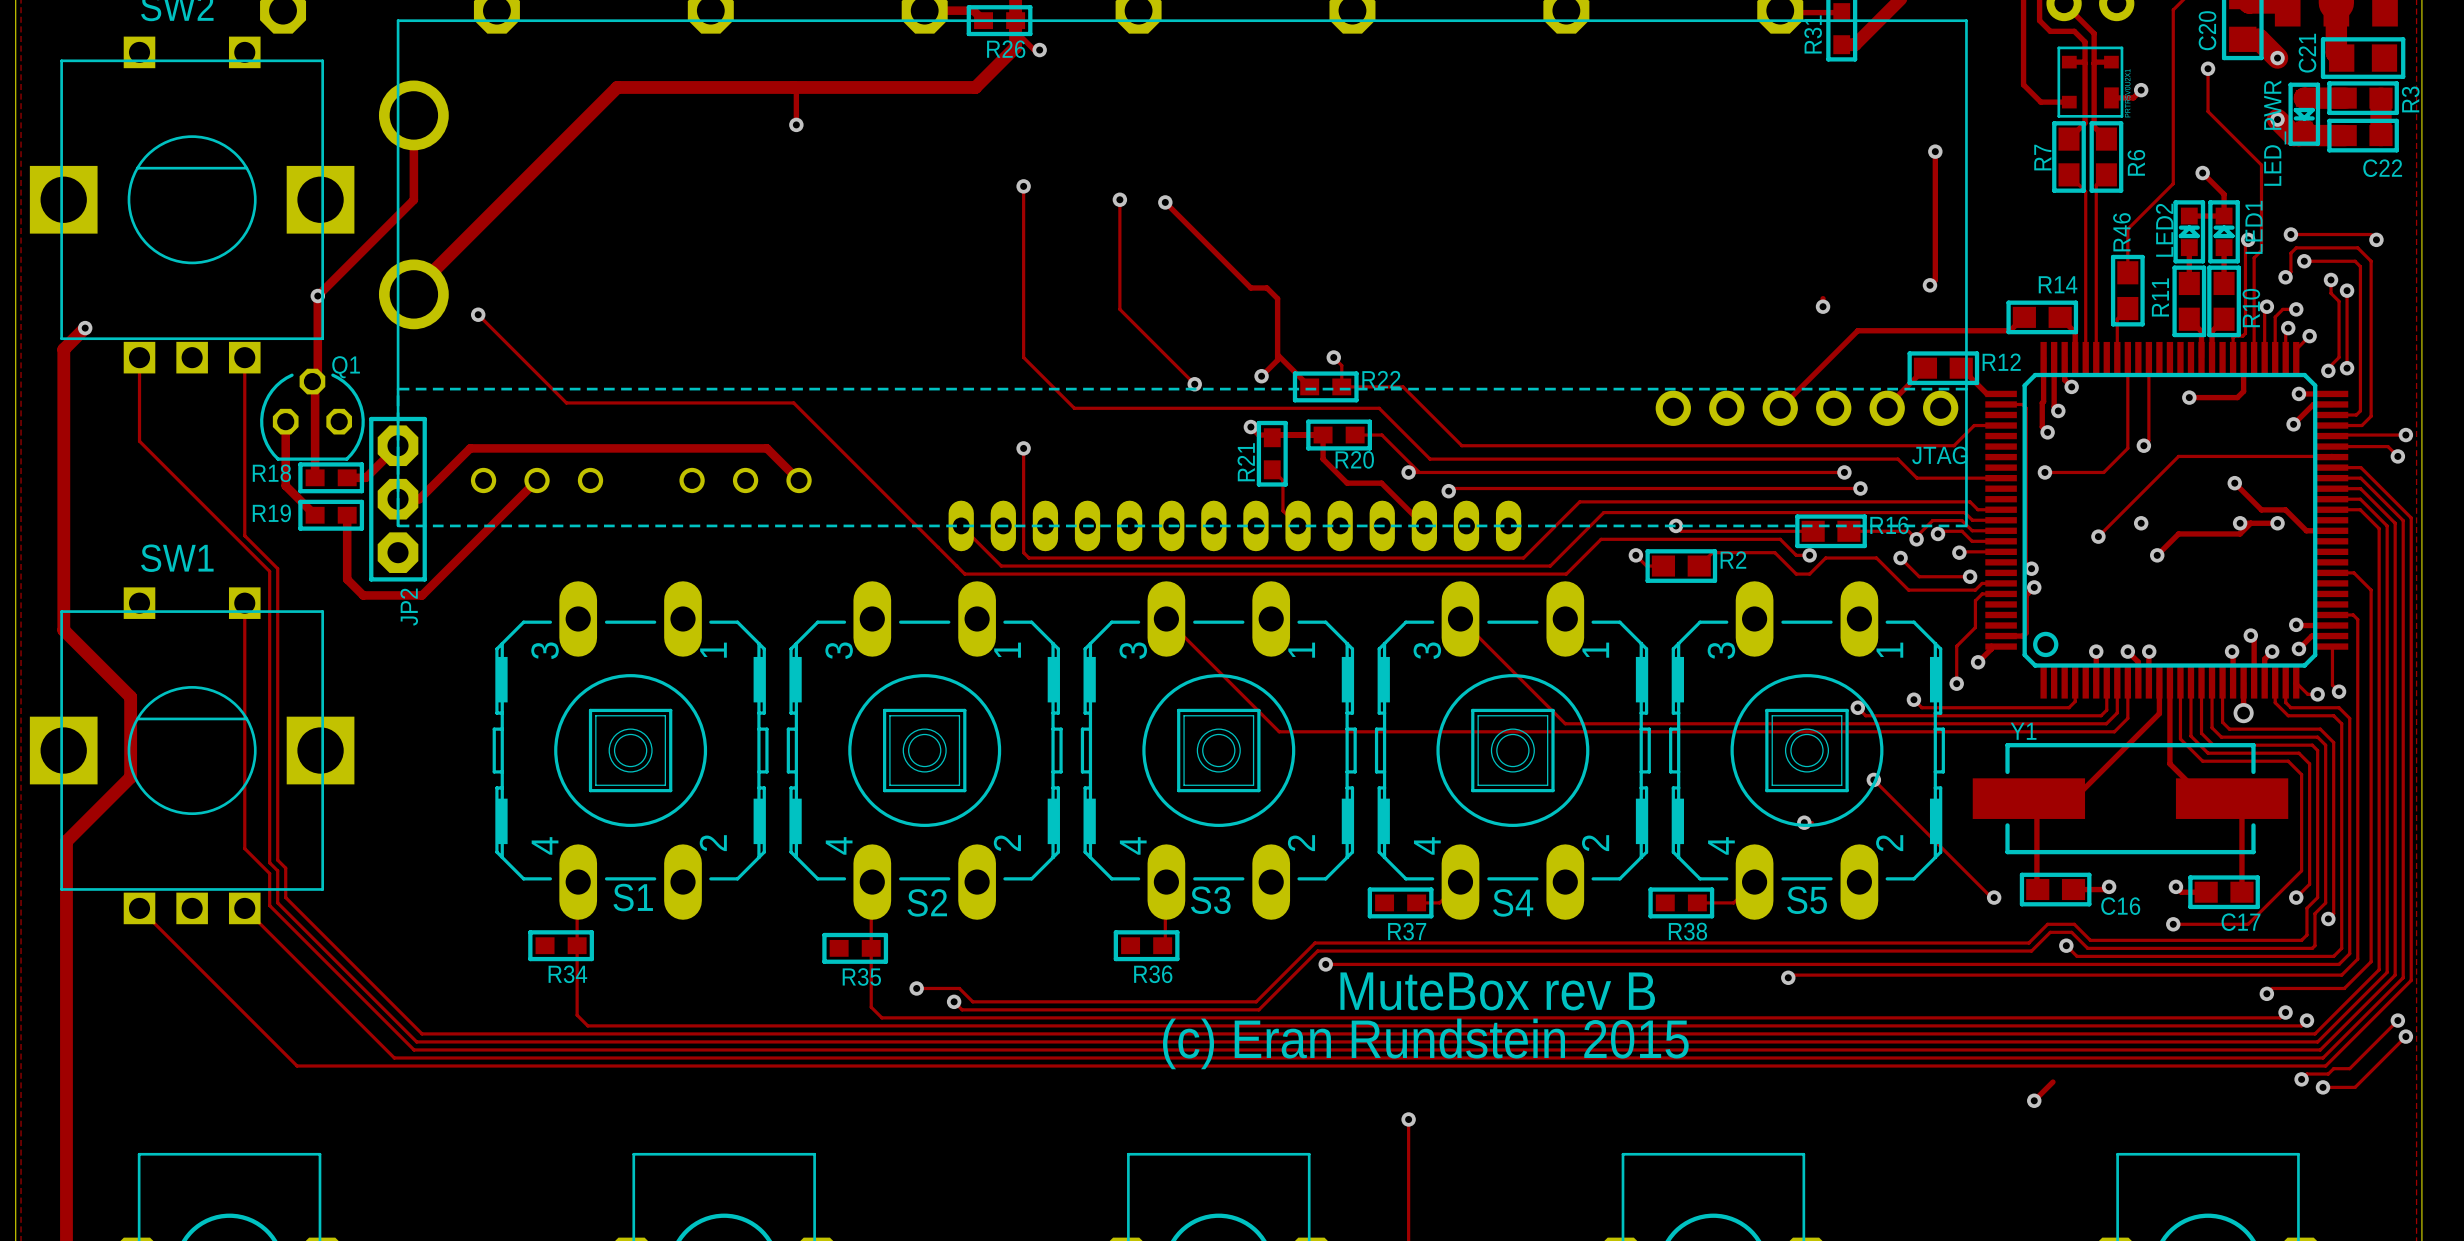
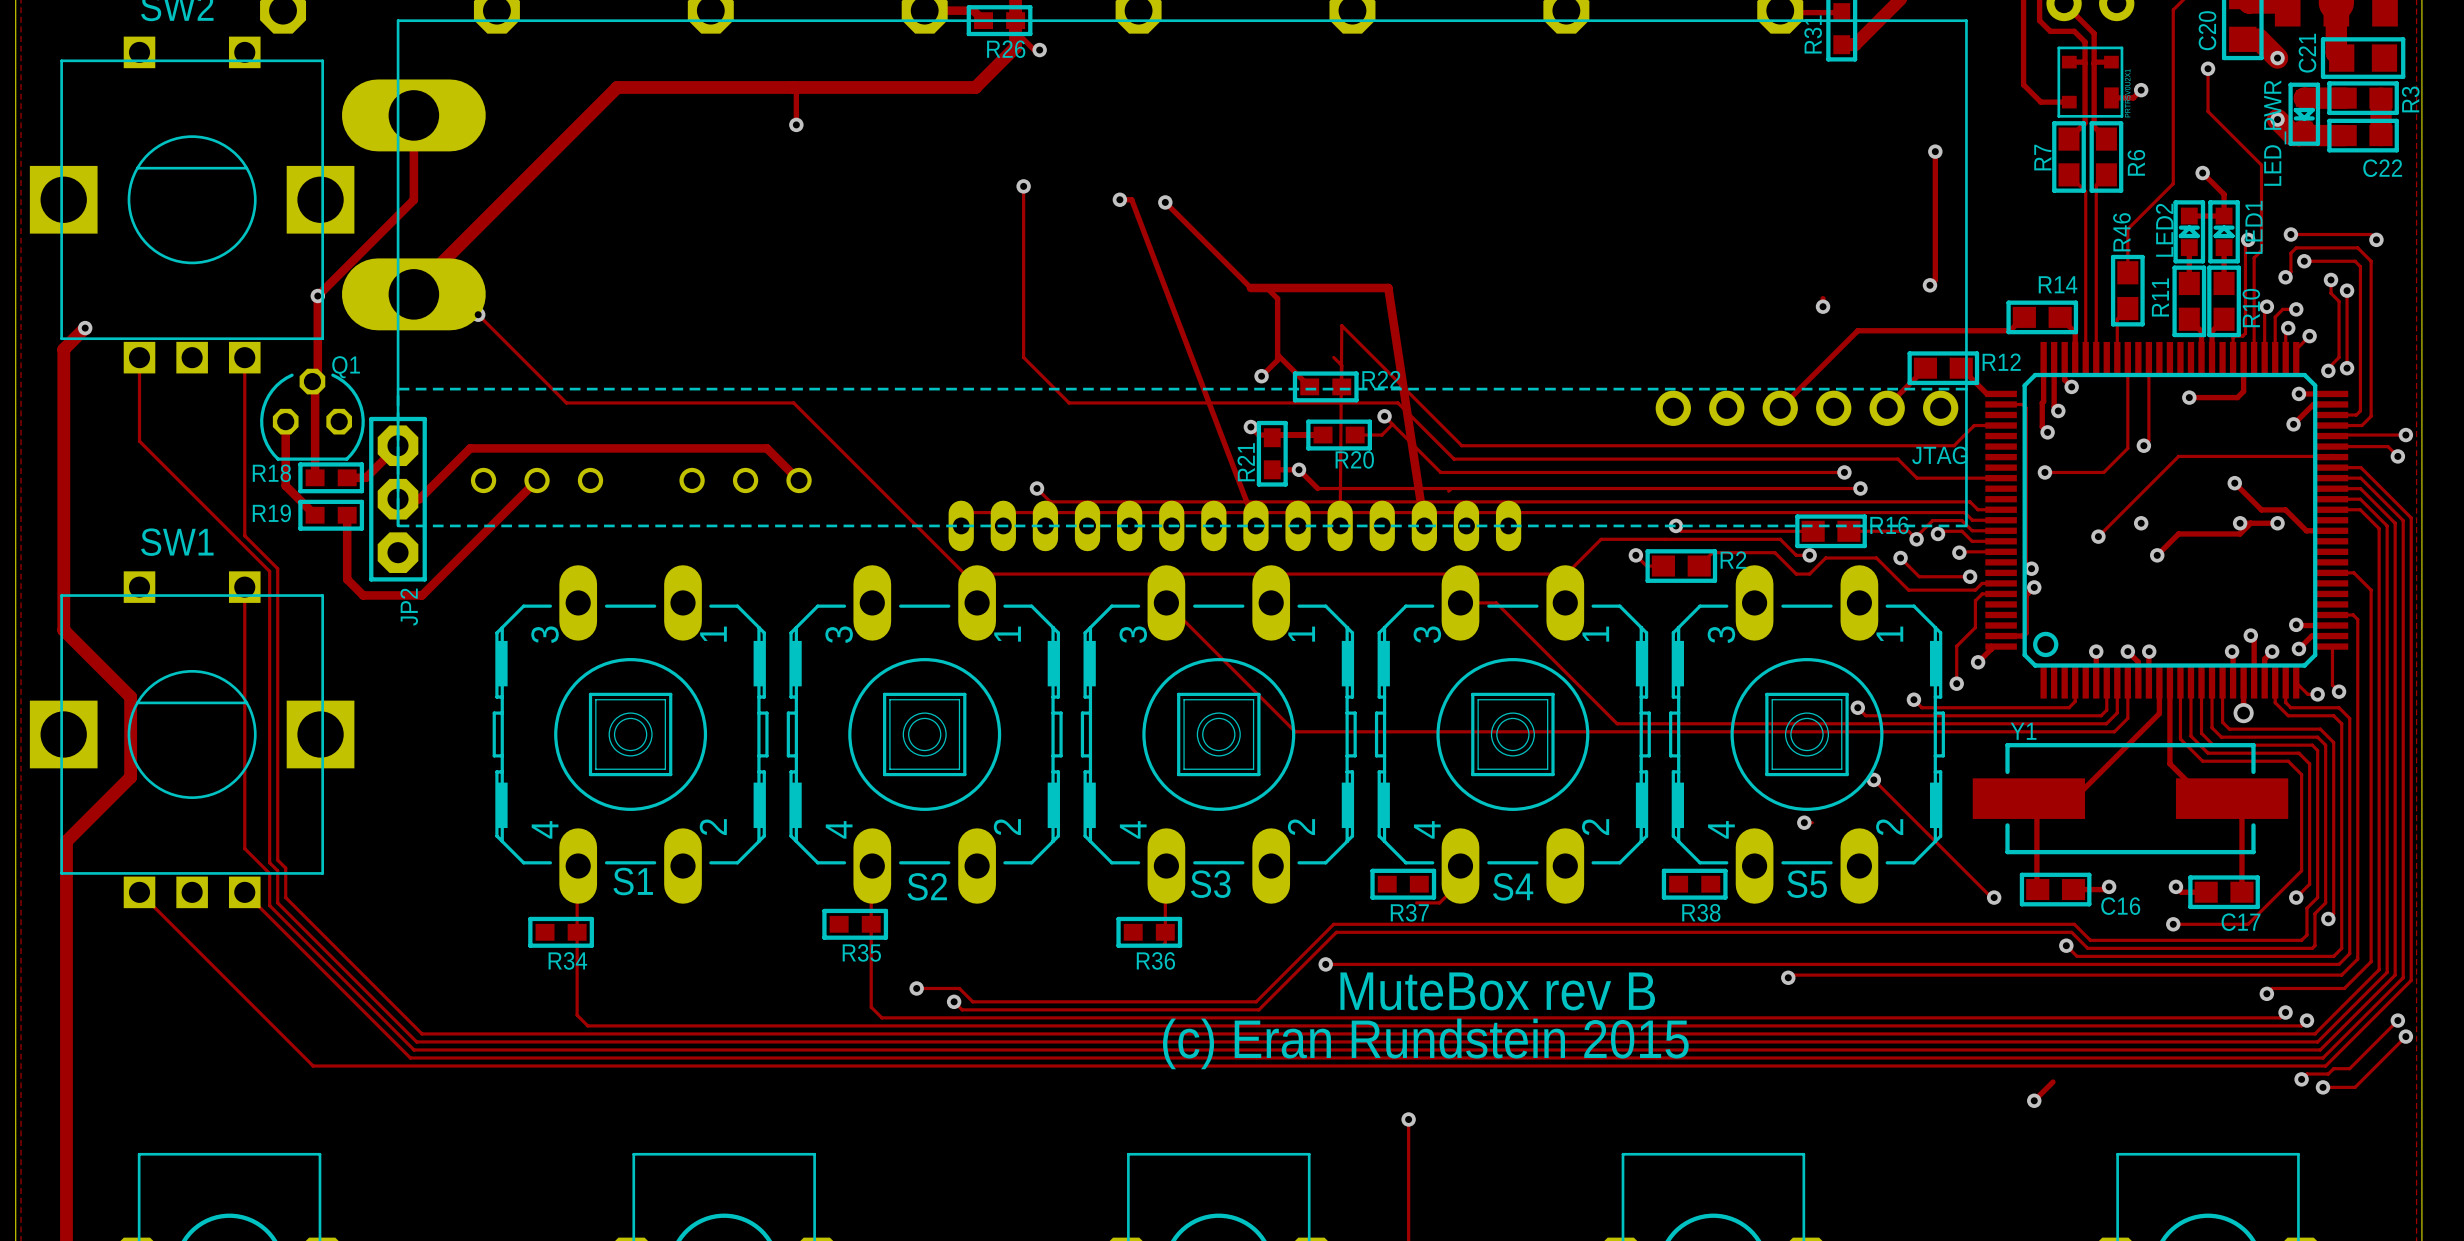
part footprint: [378, 19, 1968, 552] -> [341, 19, 1968, 552]
track: (1119, 199) (1119, 309) (1194, 384) -> (1119, 199) (1131, 199) (1255, 525)
via: (1333, 357) -> none
via: (1194, 384) -> none
track: (1341, 386) (1403, 386) -> (1340, 525) (1341, 325) (1403, 386)
track: (1069, 402) (1074, 408) (1379, 408) (1430, 459) (1454, 459) -> (1069, 402) (1397, 402) (1454, 459)
via: none -> (1384, 416)
track: (1323, 435) (1323, 459) (1347, 483) (1381, 483) (1424, 525) -> (1250, 287) (1388, 287) (1424, 525)
track: (1381, 435) (1419, 472) -> (1381, 435) (1392, 424)
track: (1023, 448) (1023, 552) (1028, 558) (1523, 558) (1579, 501) -> (1036, 488) (1050, 501) (1579, 501)
via position: (1023, 448) -> (1036, 488)
track: (1272, 469) (1282, 480) (1282, 510) (1298, 525) -> (1272, 469) (1299, 469) (1317, 488) (1451, 488)
via: none -> (1299, 469)
track: (1408, 472) (1440, 472) -> (1384, 416) (1440, 472)
via: (1408, 472) -> none
via: (1448, 491) -> none
track: (1603, 512) (1550, 566) (1001, 566) (961, 525) -> (1603, 512) (971, 512) (962, 504) (961, 525)
track: (1166, 618) (1279, 731) (1295, 731) -> (1166, 603) (1295, 731)
track: (1460, 618) (1565, 723) (1617, 723) -> (1460, 602) (1496, 602) (1617, 723)
S1 position: (630, 750) -> (630, 734)
S2 position: (924, 750) -> (924, 734)
S3 position: (1218, 750) -> (1218, 734)
S4 position: (1512, 750) -> (1512, 734)
S5 position: (1806, 750) -> (1806, 734)
SW1 position: (192, 755) -> (192, 739)
track: (1754, 882) (1733, 902) (1697, 902) -> none
R37 position: (1400, 902) -> (1403, 884)
R38 position: (1681, 902) -> (1694, 884)
track: (139, 908) (297, 1066) (313, 1066) -> (139, 892) (313, 1066)
track: (244, 908) (394, 1057) (410, 1057) -> (244, 892) (410, 1057)
track: (2047, 924) (2028, 943) (1315, 943) -> (2047, 924) (1333, 924) (1315, 943)
track: (2050, 932) (2031, 951) (1317, 951) -> (2050, 932) (1336, 932) (1317, 951)
R34 position: (561, 945) -> (561, 932)
R36 position: (1146, 945) -> (1149, 932)
R35 position: (855, 948) -> (855, 924)

